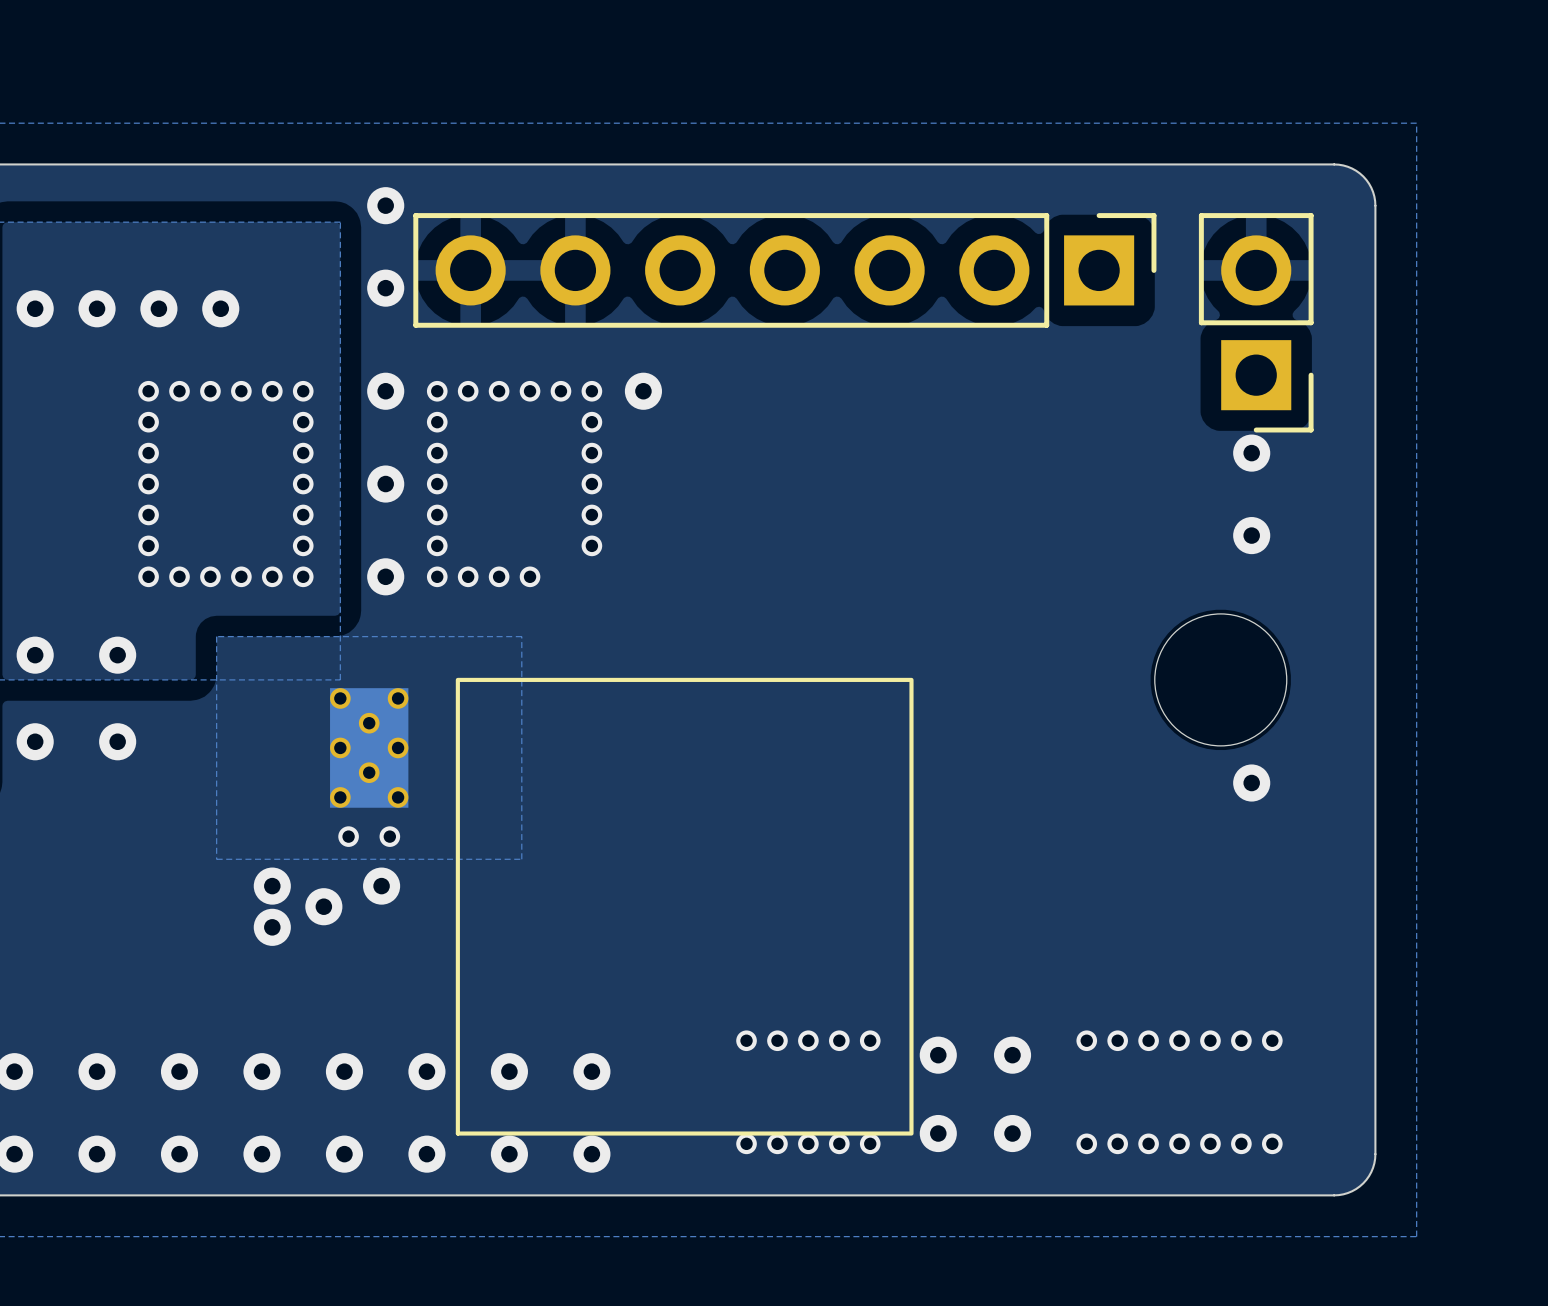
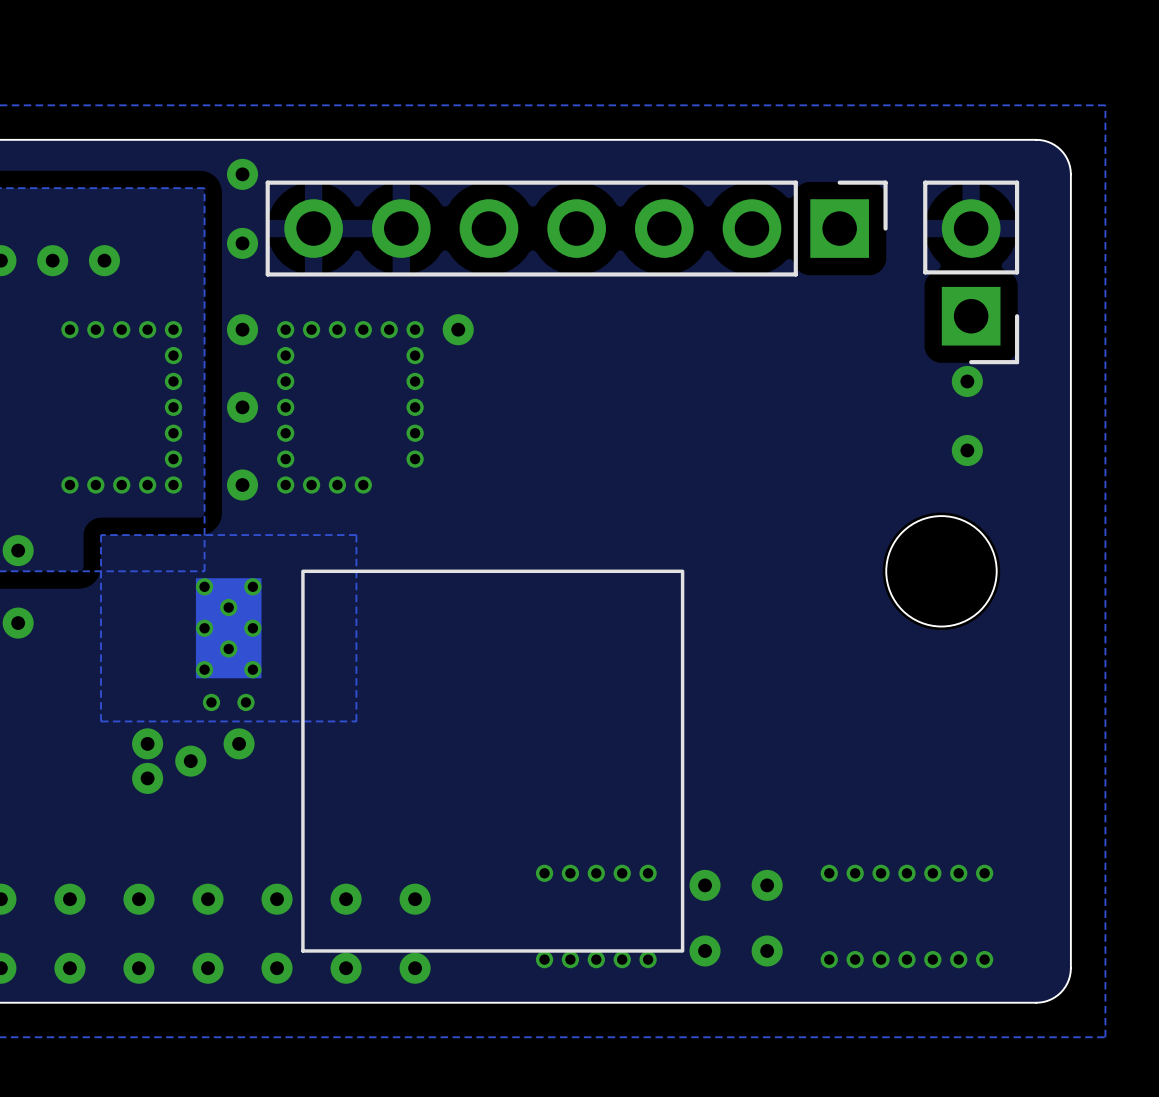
via: (148, 391) -> none
via: (148, 422) -> none
via: (148, 453) -> none
via: (148, 484) -> none
via: (148, 514) -> none
via: (148, 545) -> none
via: (148, 576) -> none
via: (1251, 783) -> none

